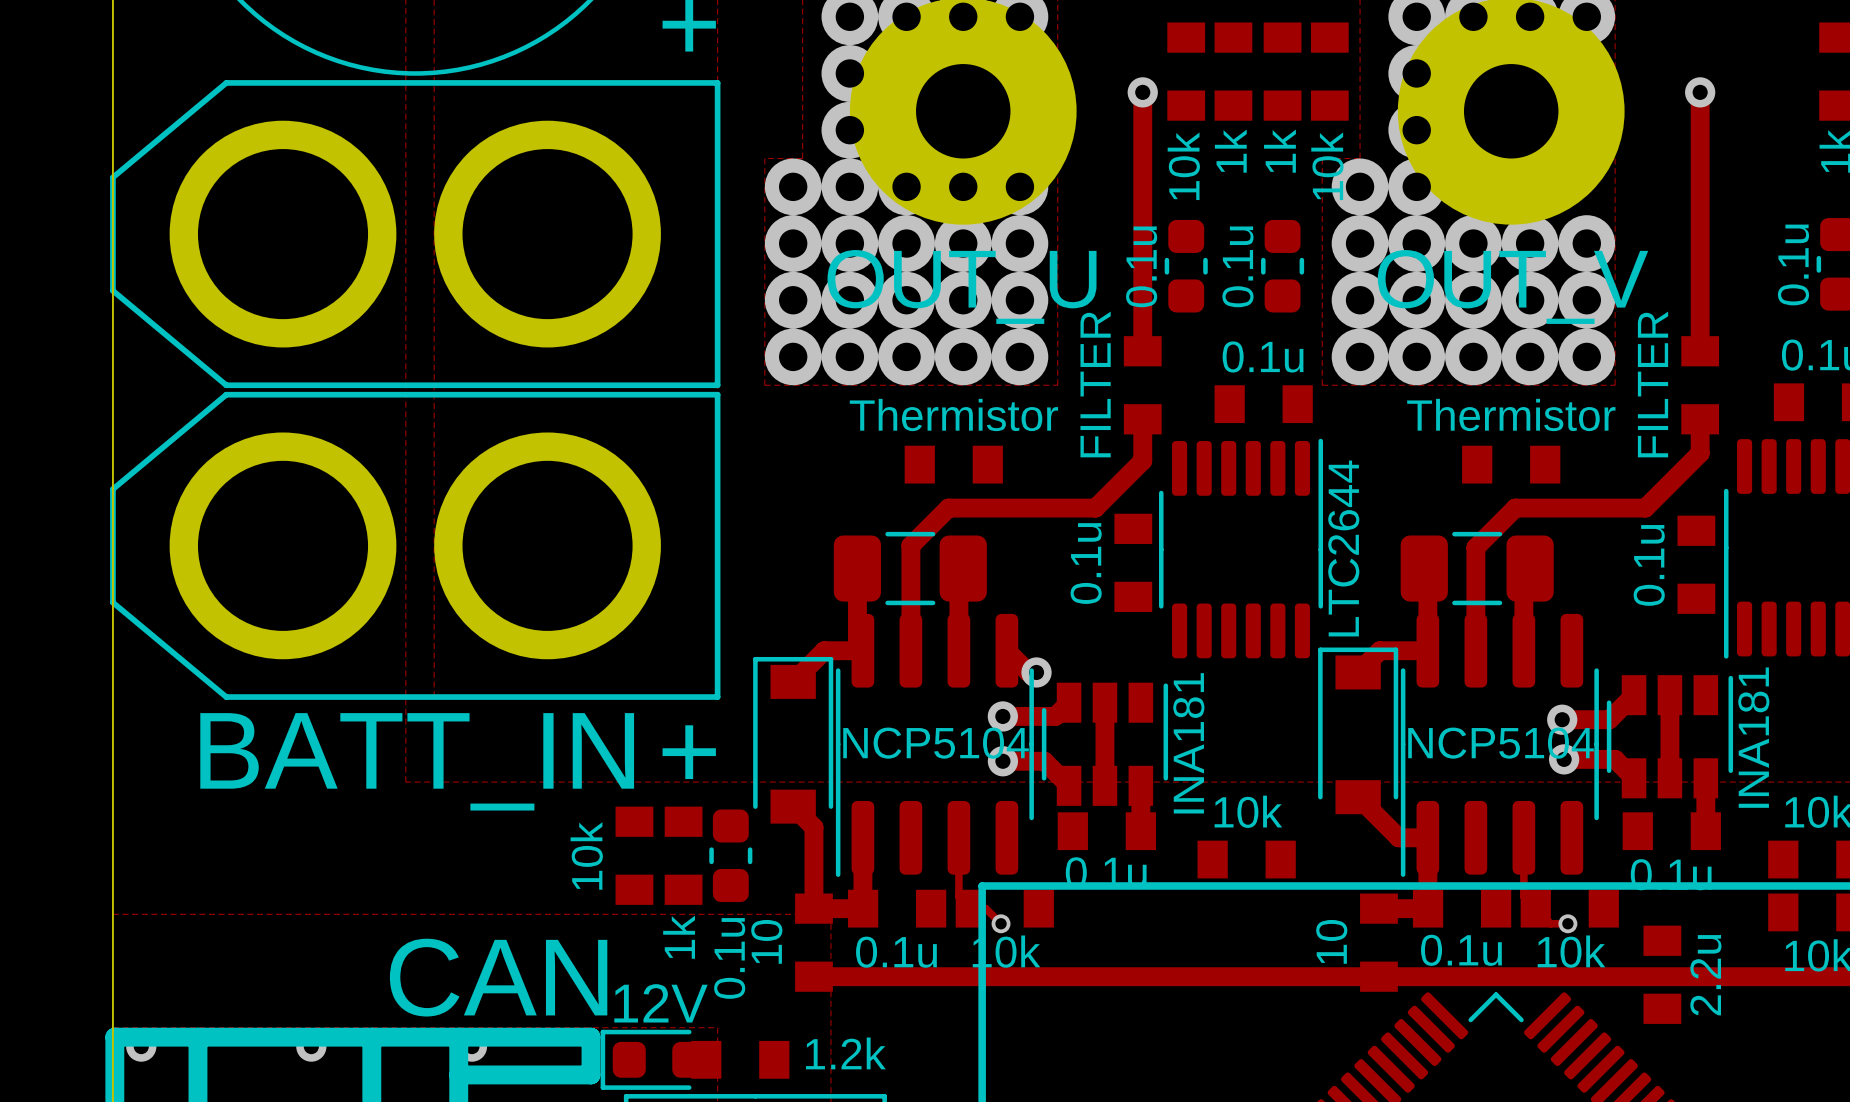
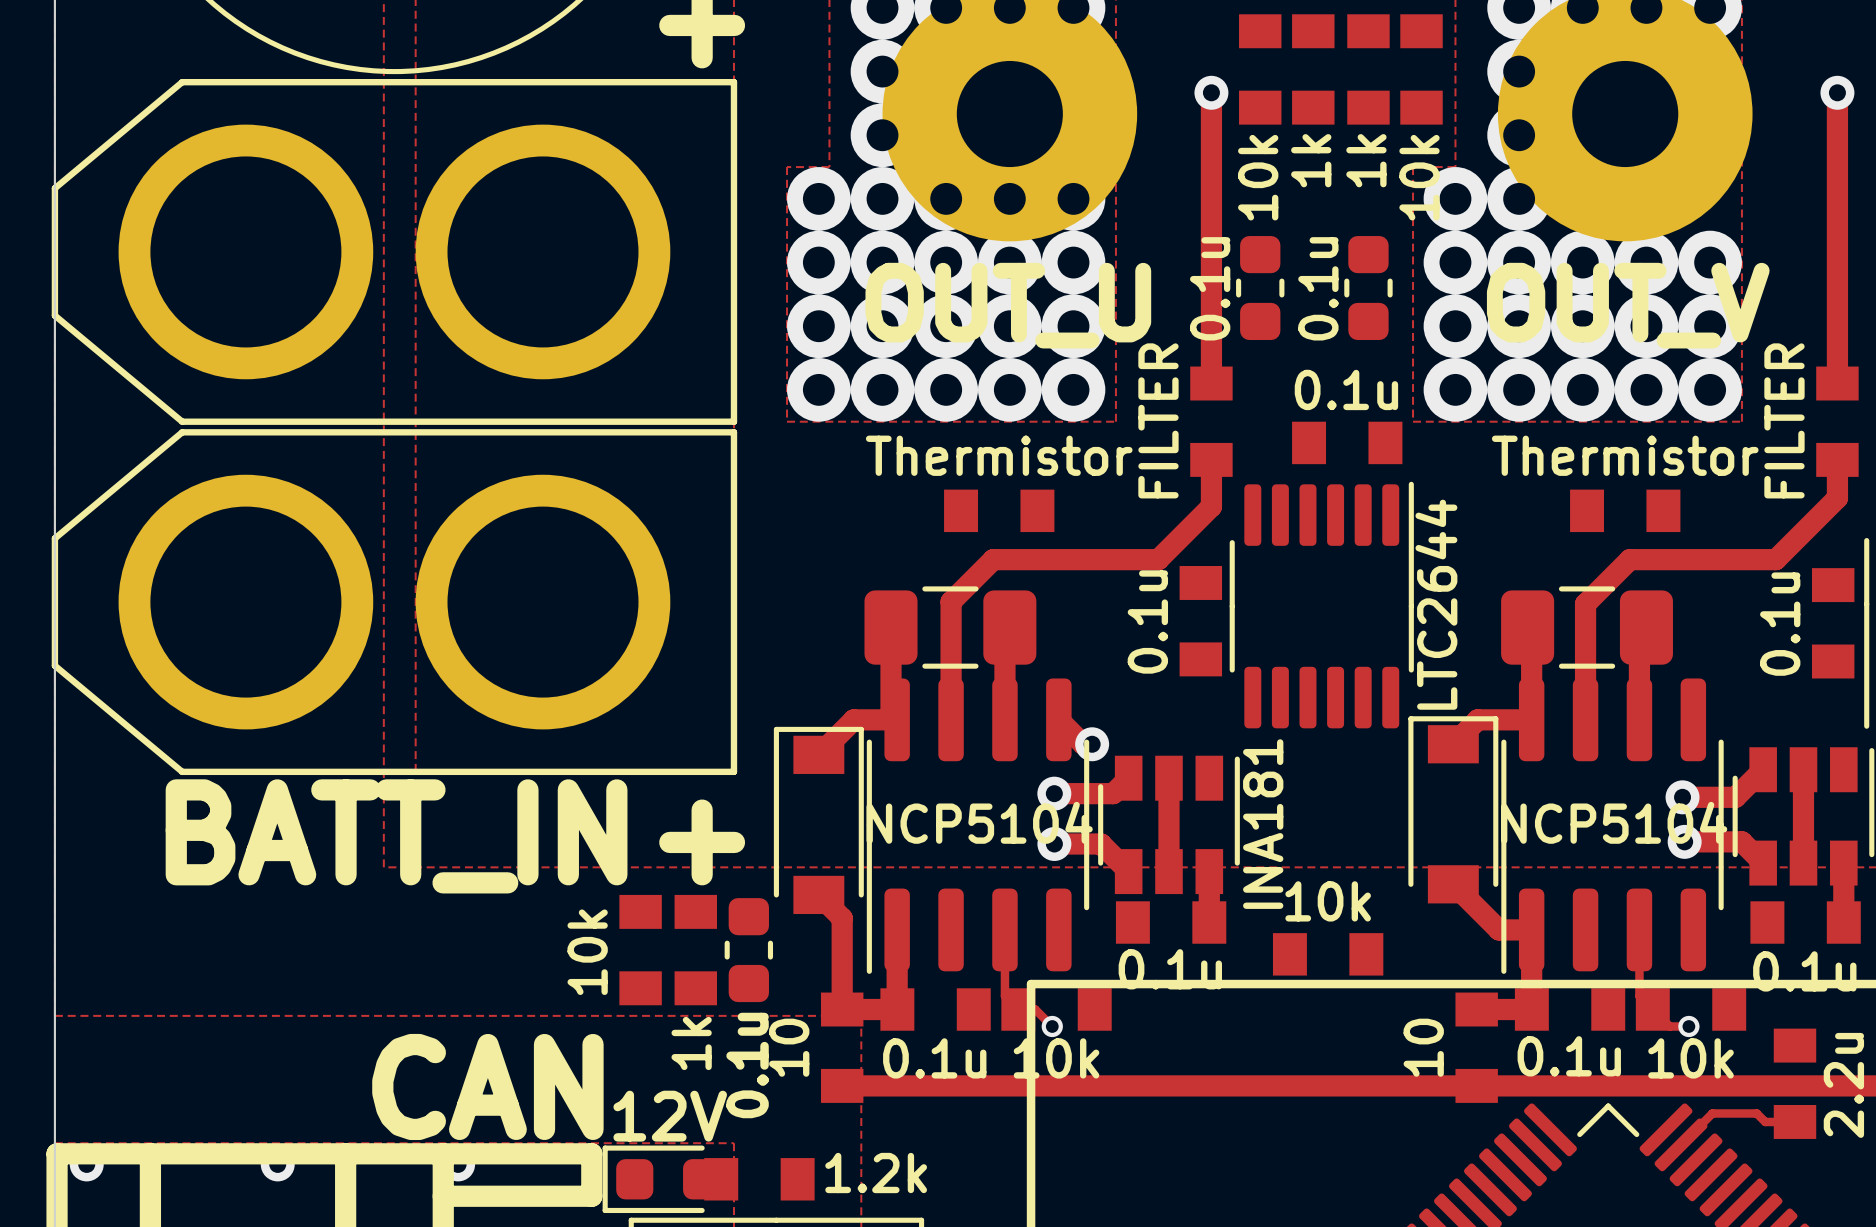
track: none -> (1794, 1121) (1765, 1121) (1756, 1113) (1712, 1113) (1681, 1144)

